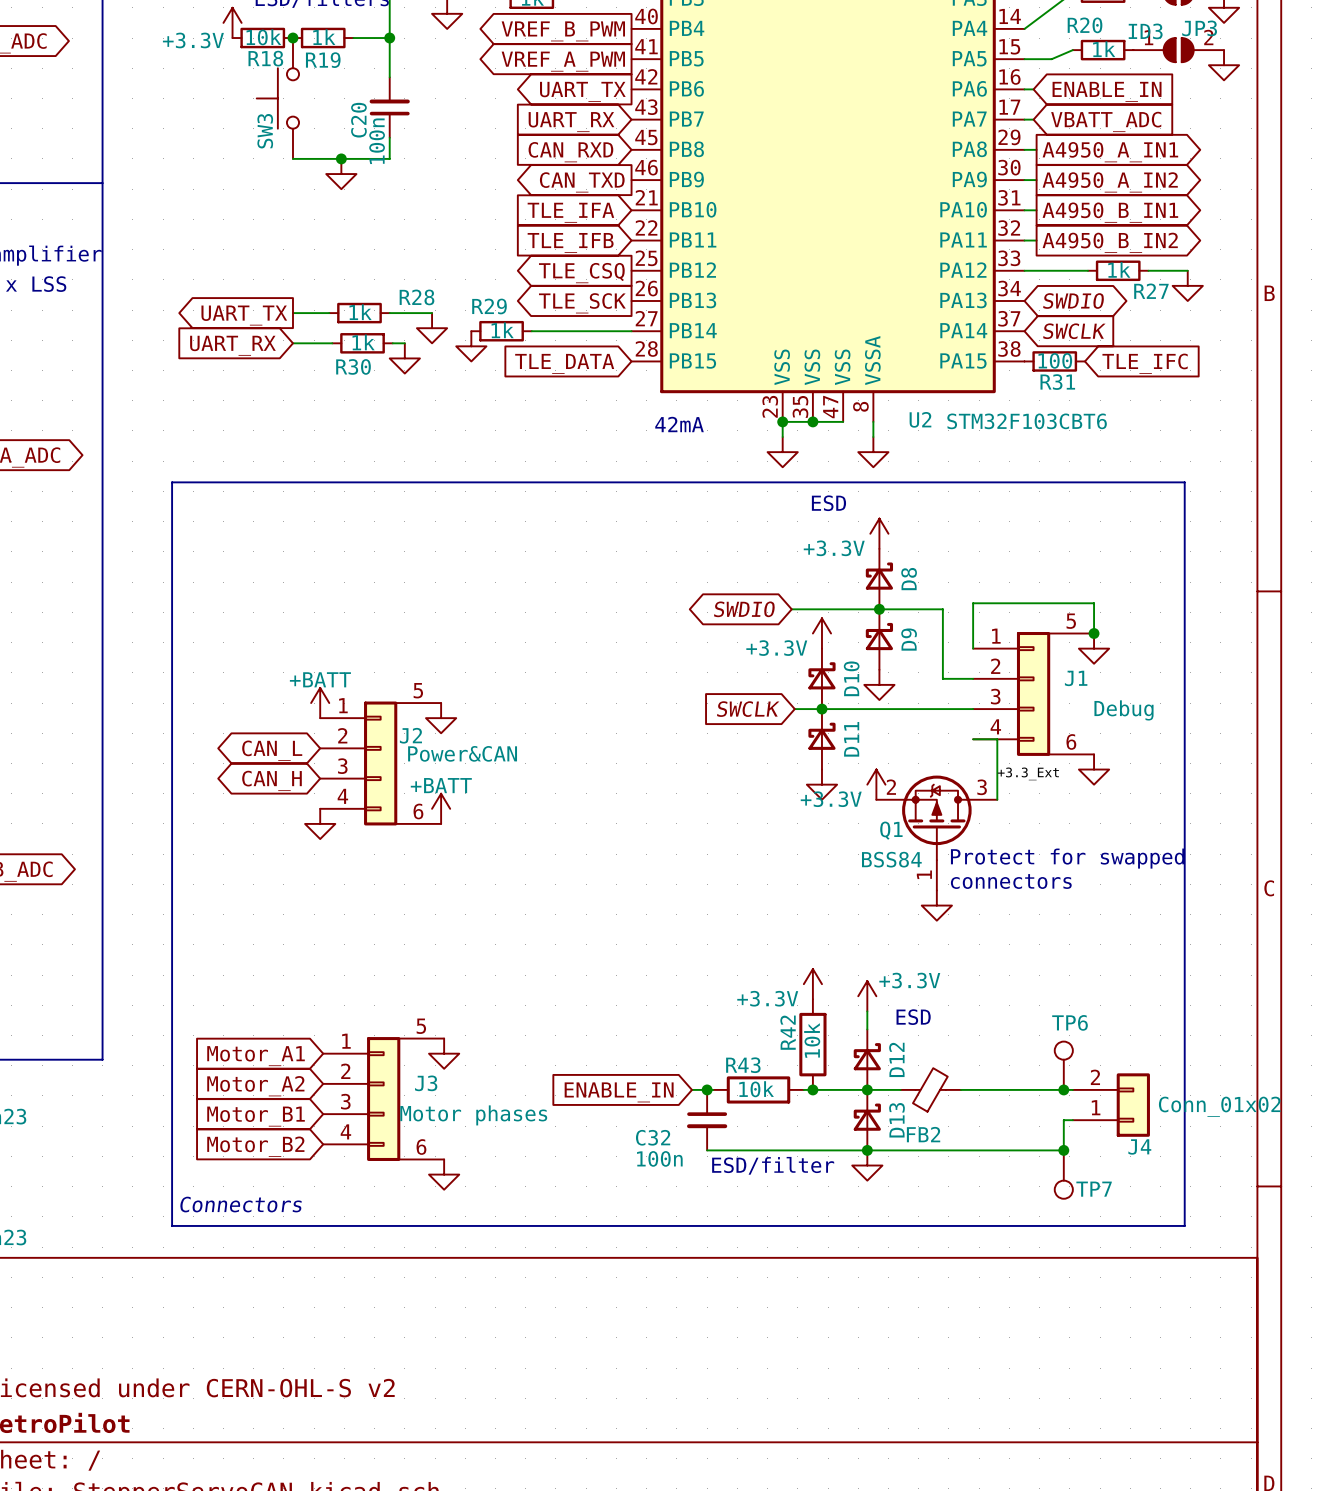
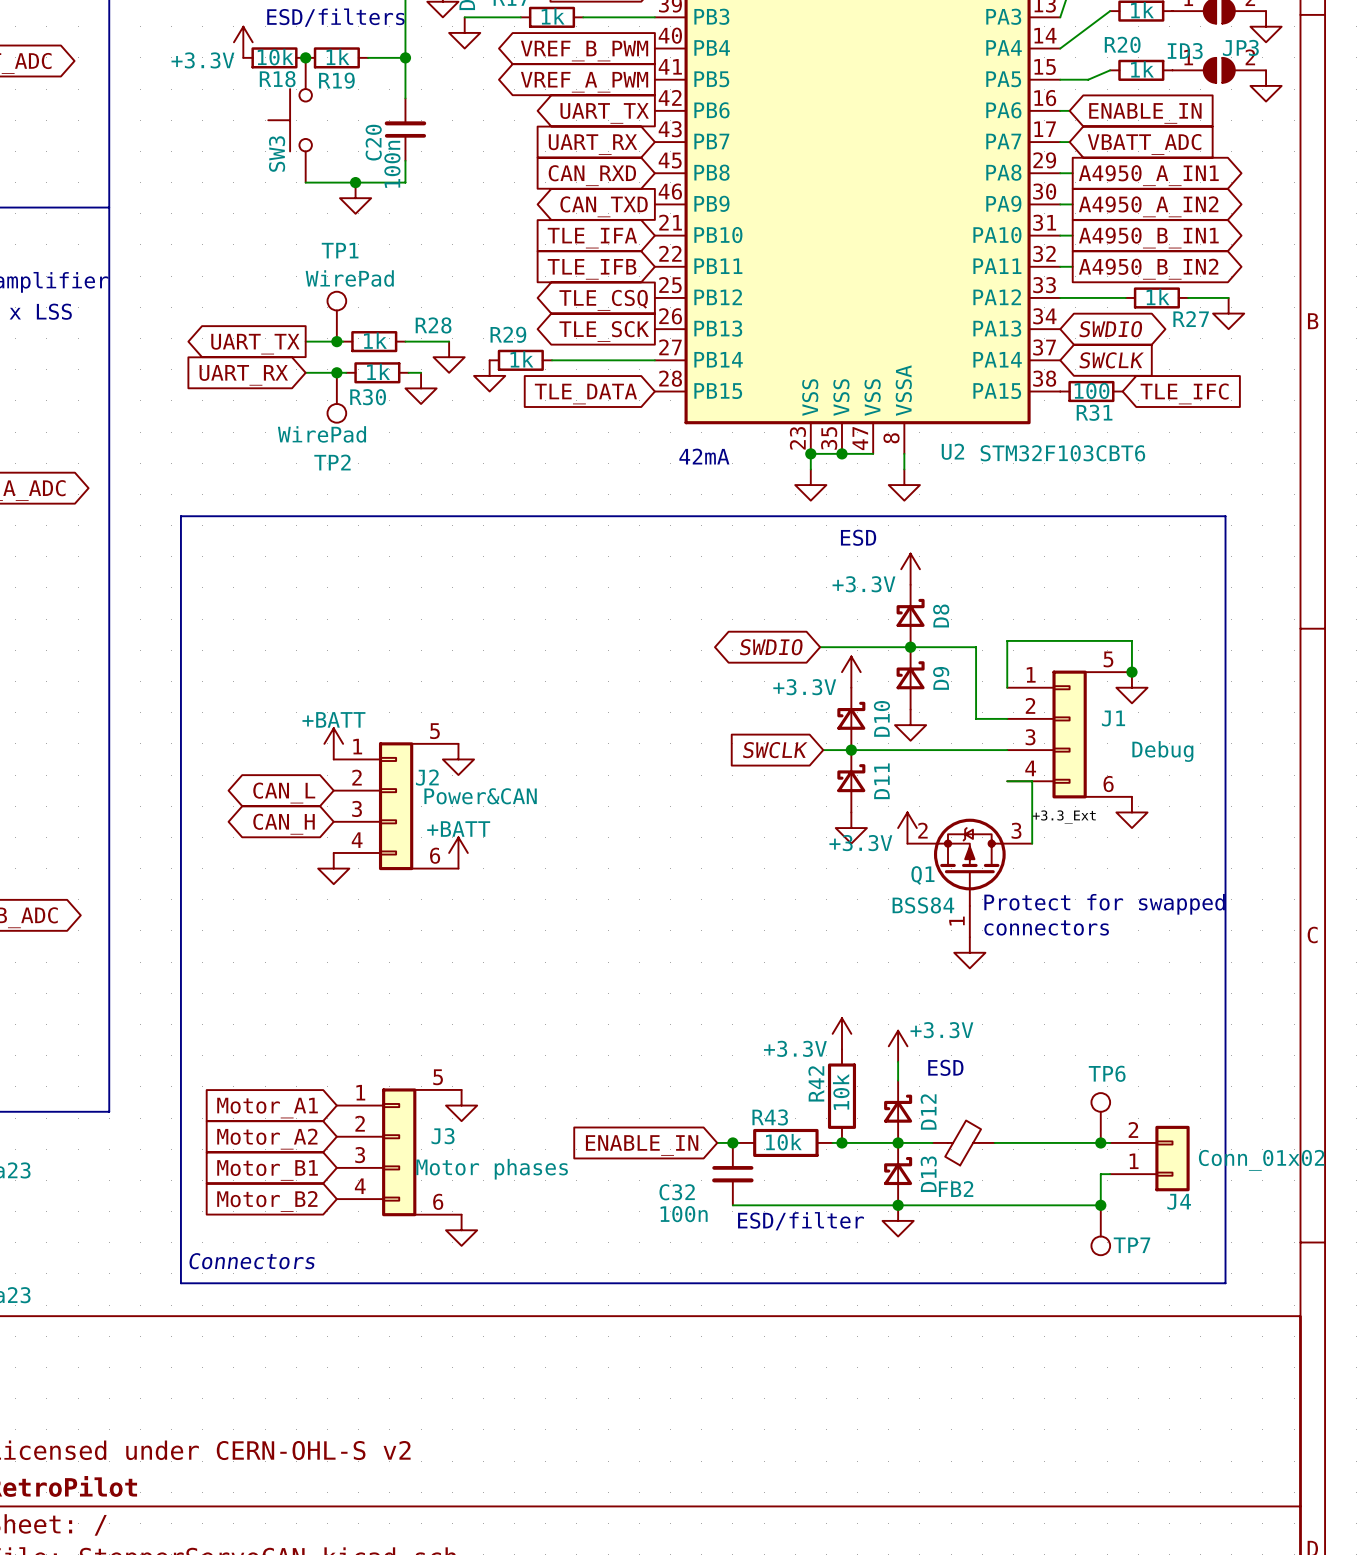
TP1: none -> WirePad (336, 316)
junction: none -> (336, 341)
junction: none -> (336, 372)
TP2: none -> WirePad (336, 397)

